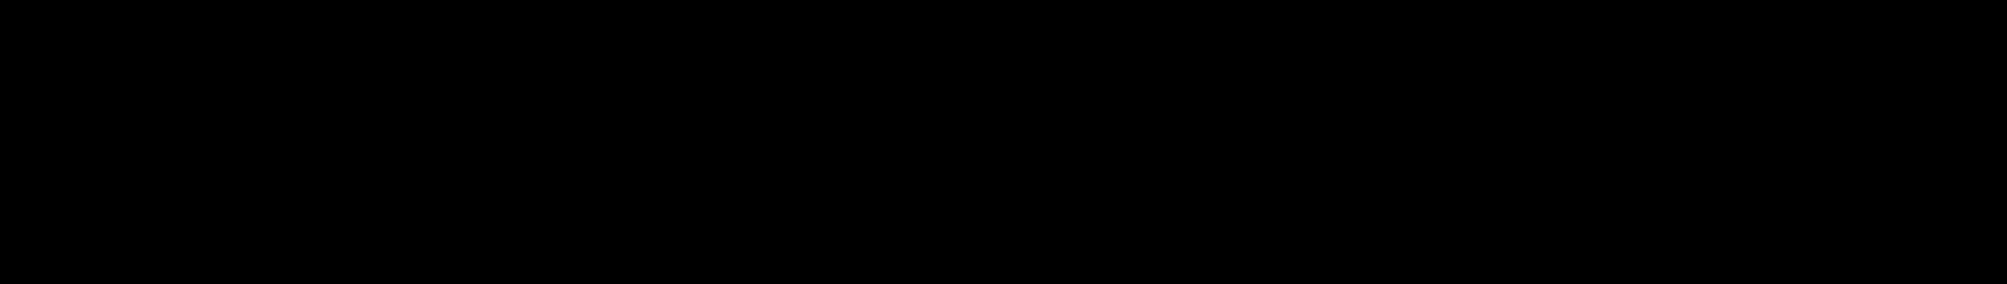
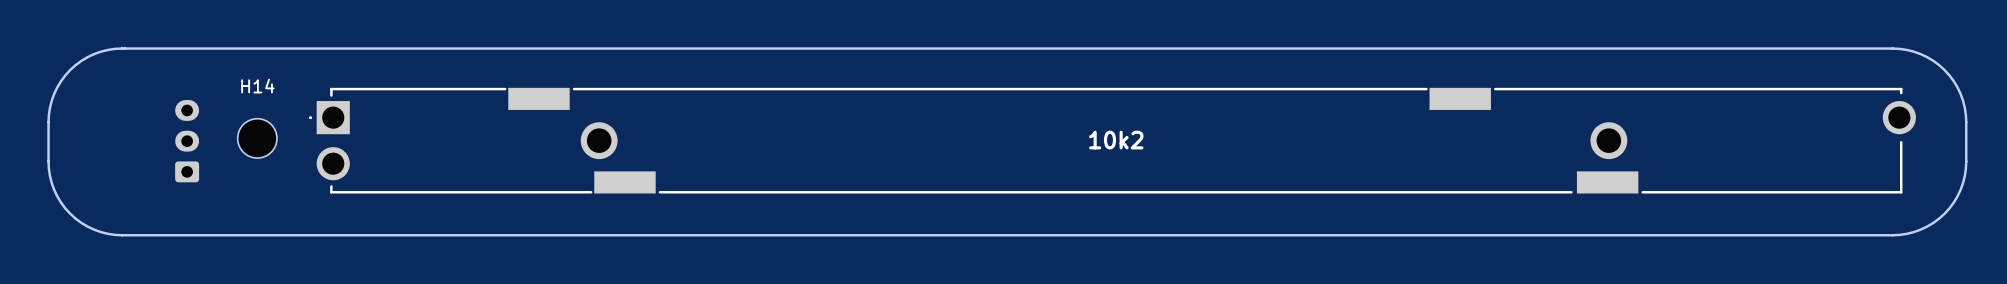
board edge: none -> (122, 48) (1899, 48) (1913, 51) (1933, 60) (1949, 75) (1957, 87) (1965, 115) (1965, 168) (1960, 189) (1944, 213) (1920, 229) (1892, 235) (115, 234) (93, 229) (81, 222) (65, 208) (57, 196) (48, 168) (48, 122) (54, 94) (70, 70) (94, 54) (122, 48)
H14: none -> (257, 138)
10k2: none -> (1112, 140)
part: none -> (187, 141)

